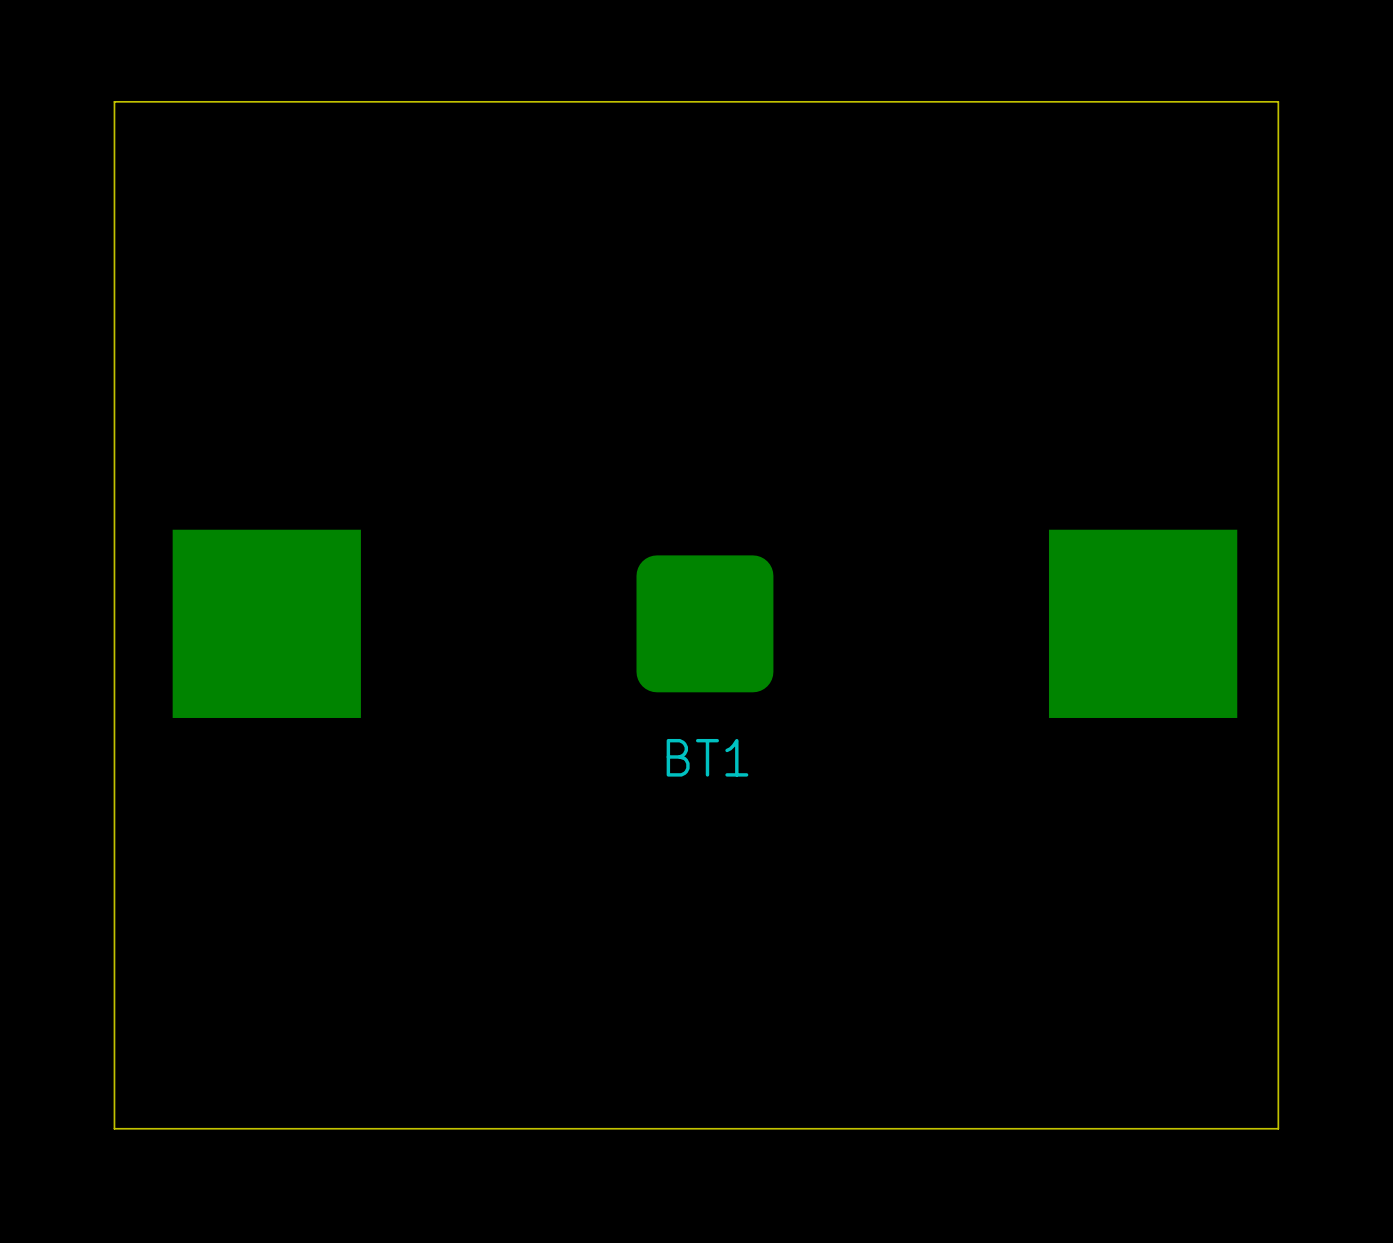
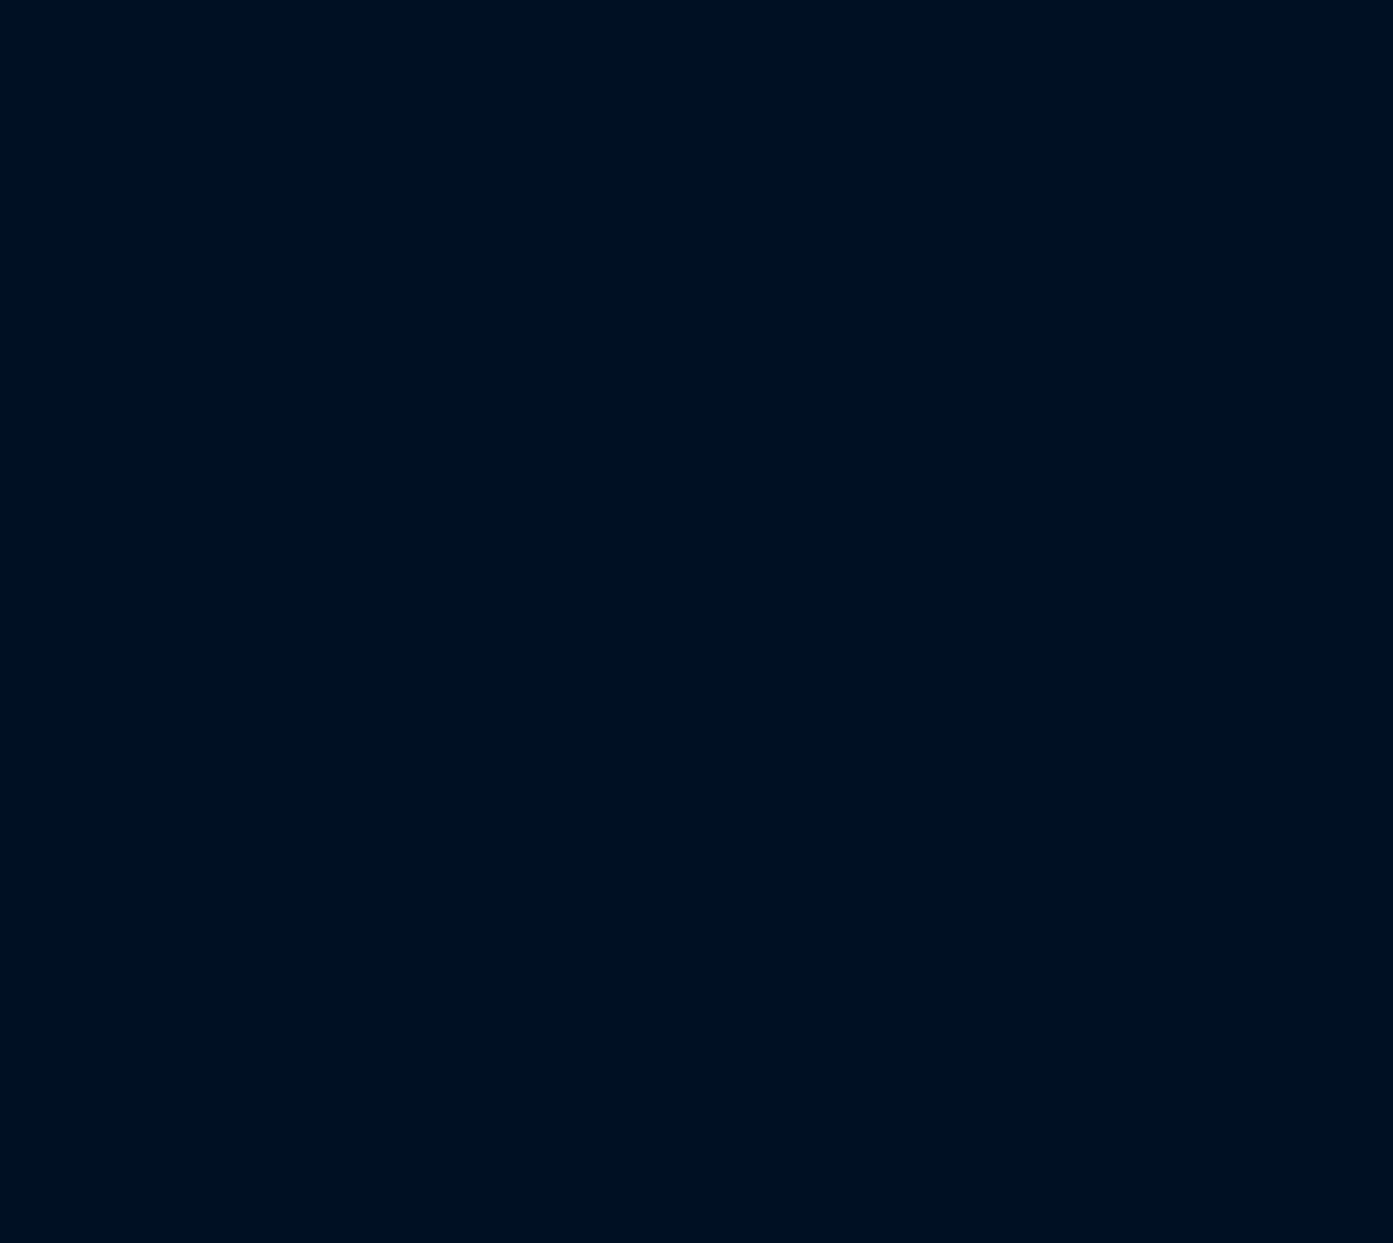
board edge: (1278, 101) (1278, 1128) (114, 1128) (114, 101) (1278, 101) -> none
BT1: (704, 623) -> none

